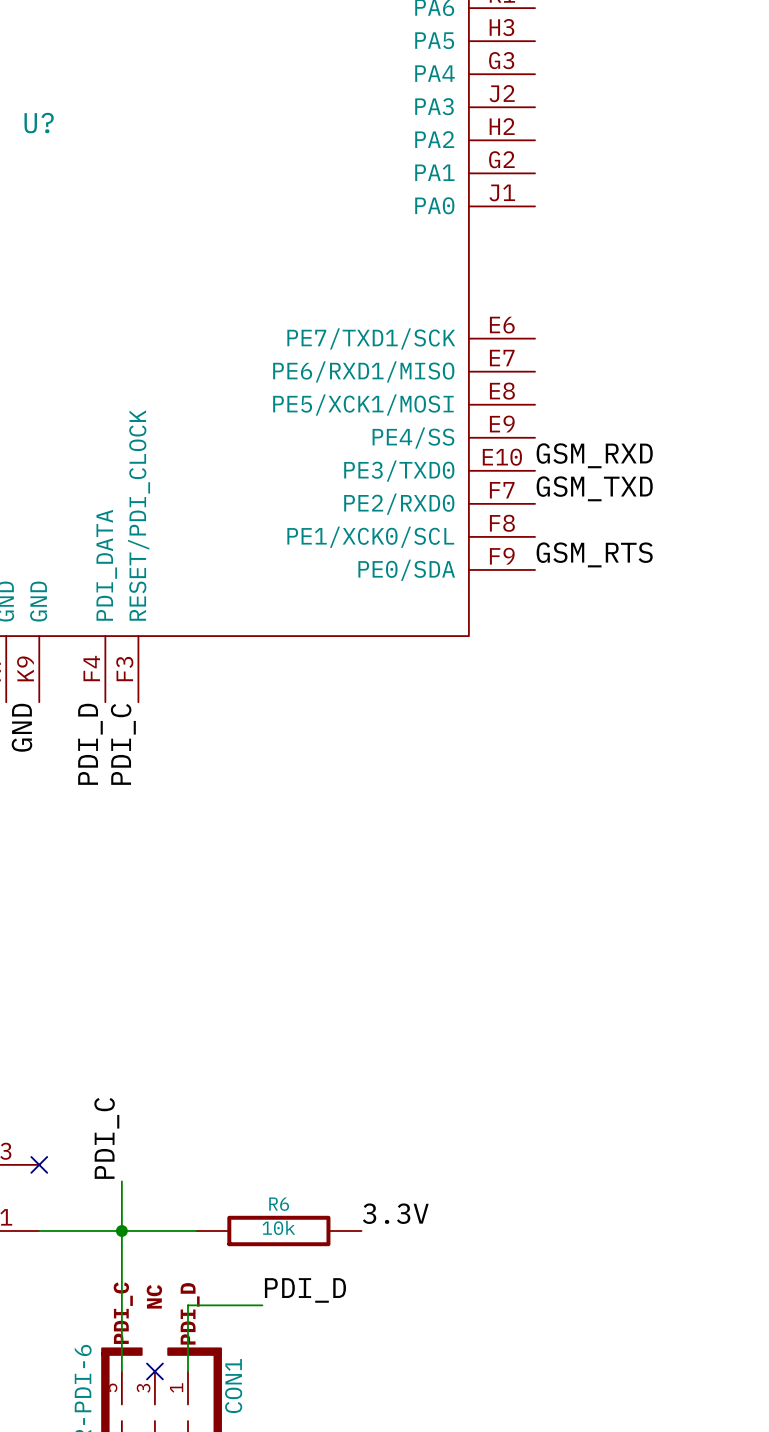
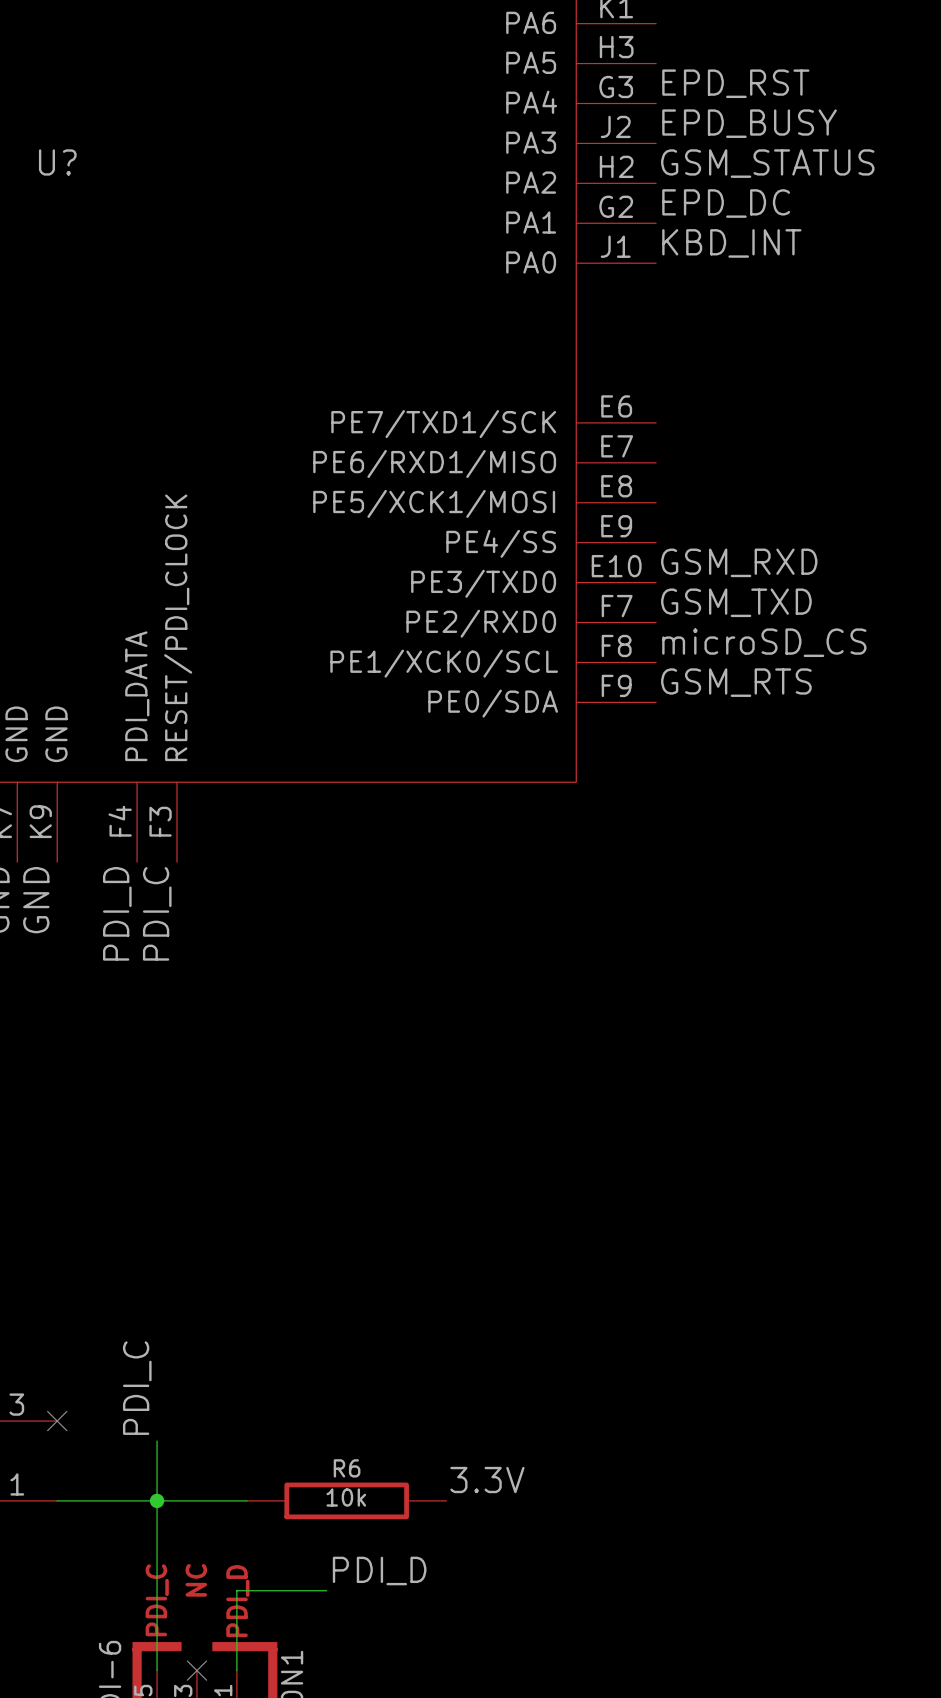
label: none -> EPD_RST (735, 83)
label: none -> EPD_BUSY (749, 123)
label: none -> GSM_STATUS (767, 163)
label: none -> EPD_DC (726, 203)
label: none -> KBD_INT (731, 243)
label: none -> microSD_CS (764, 642)

